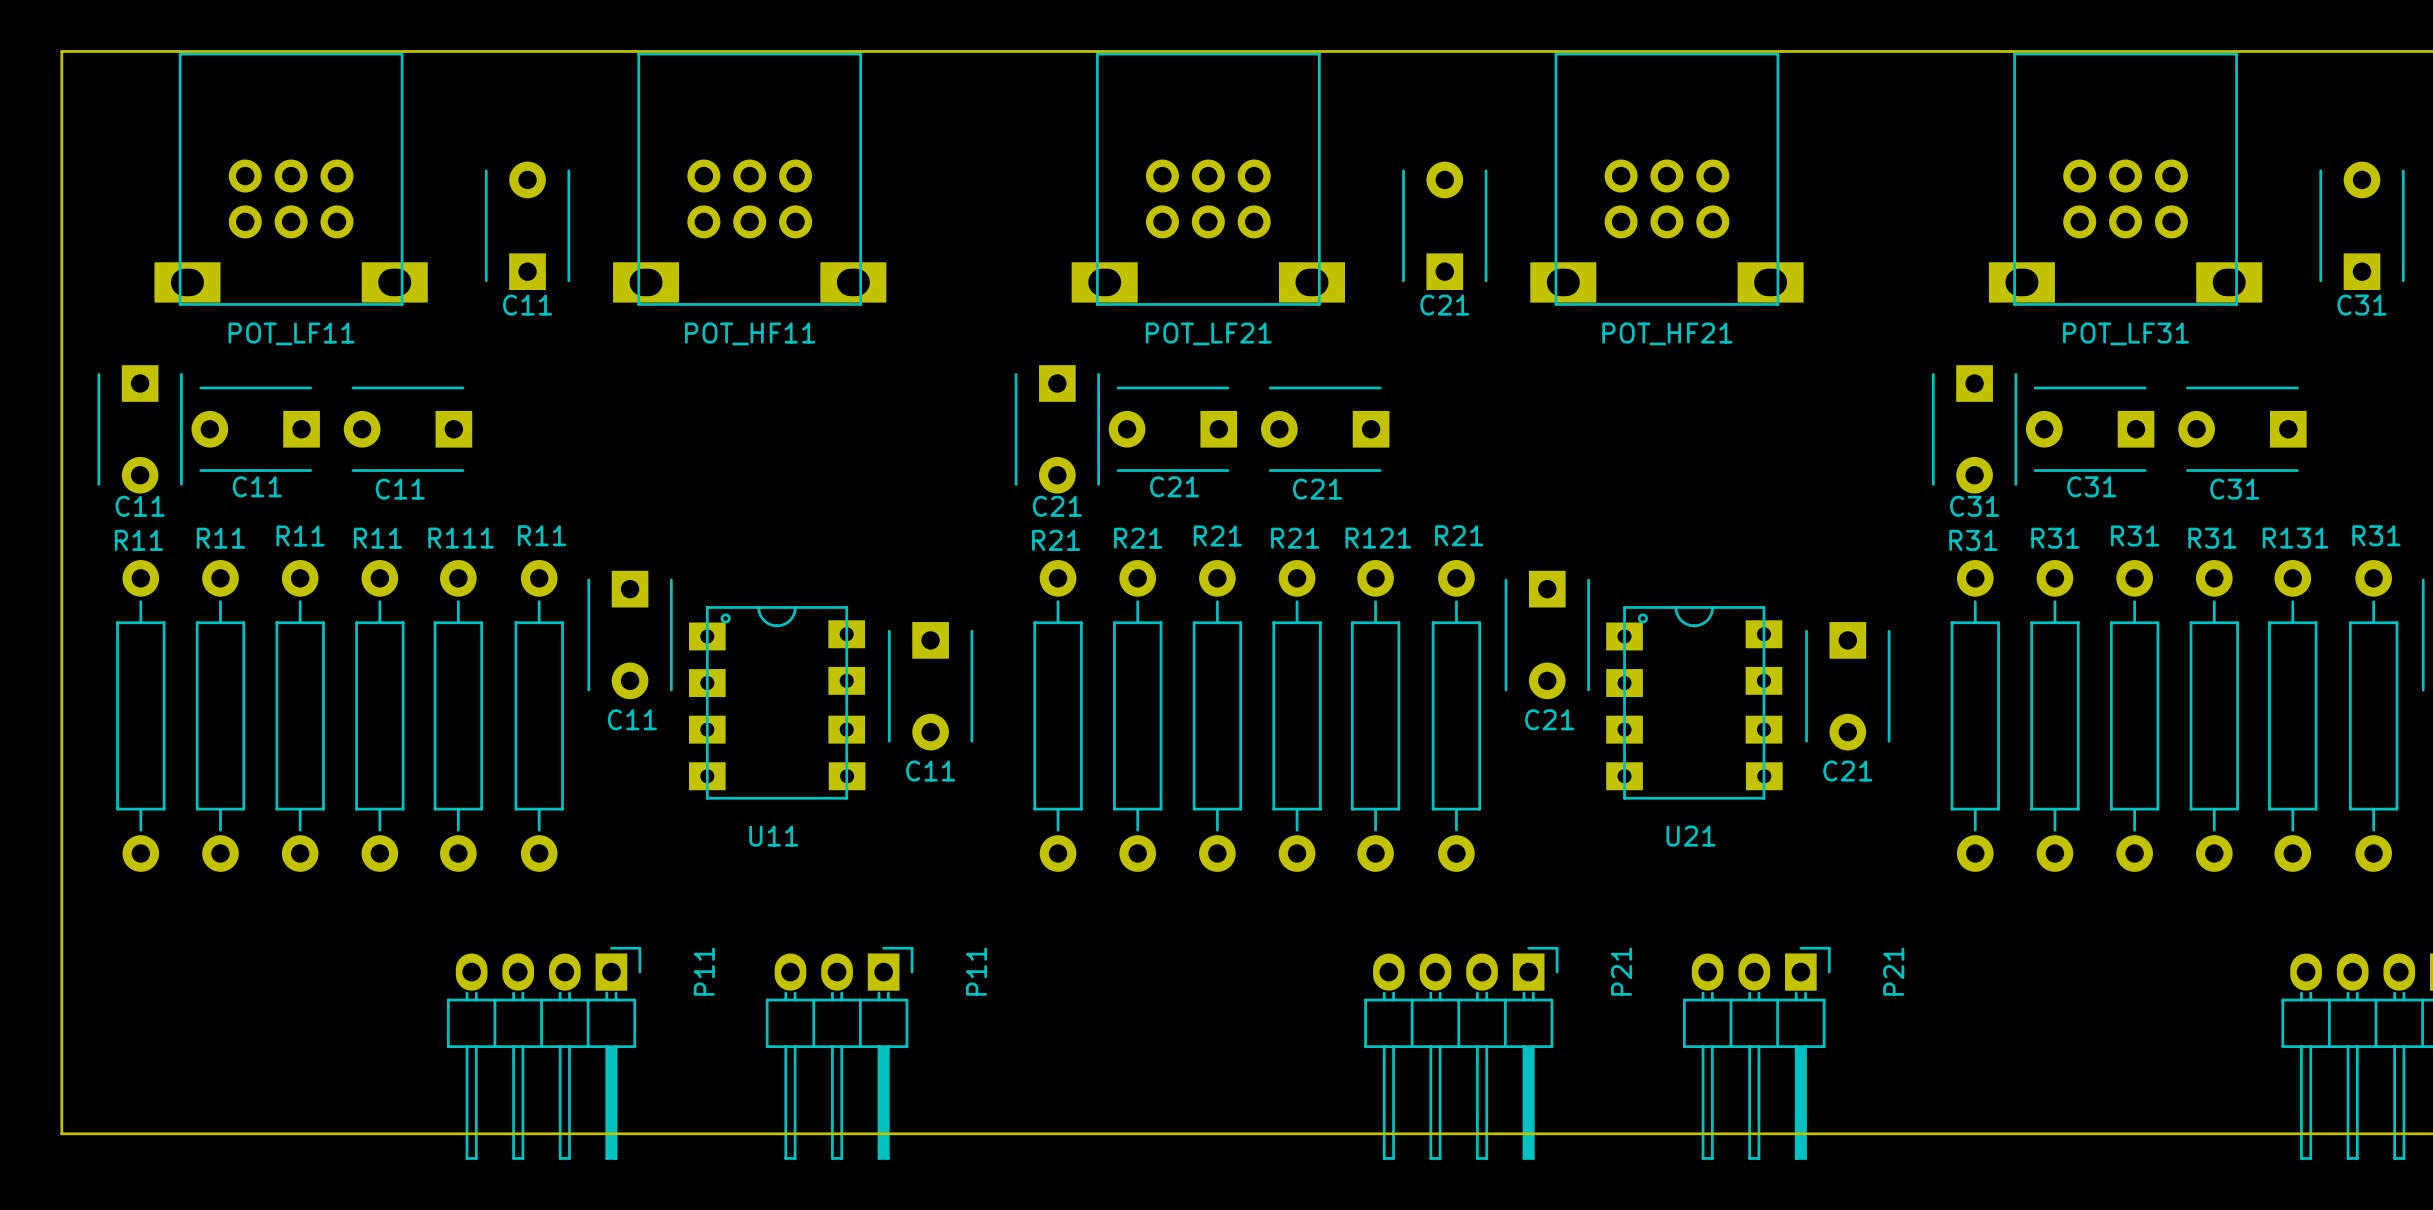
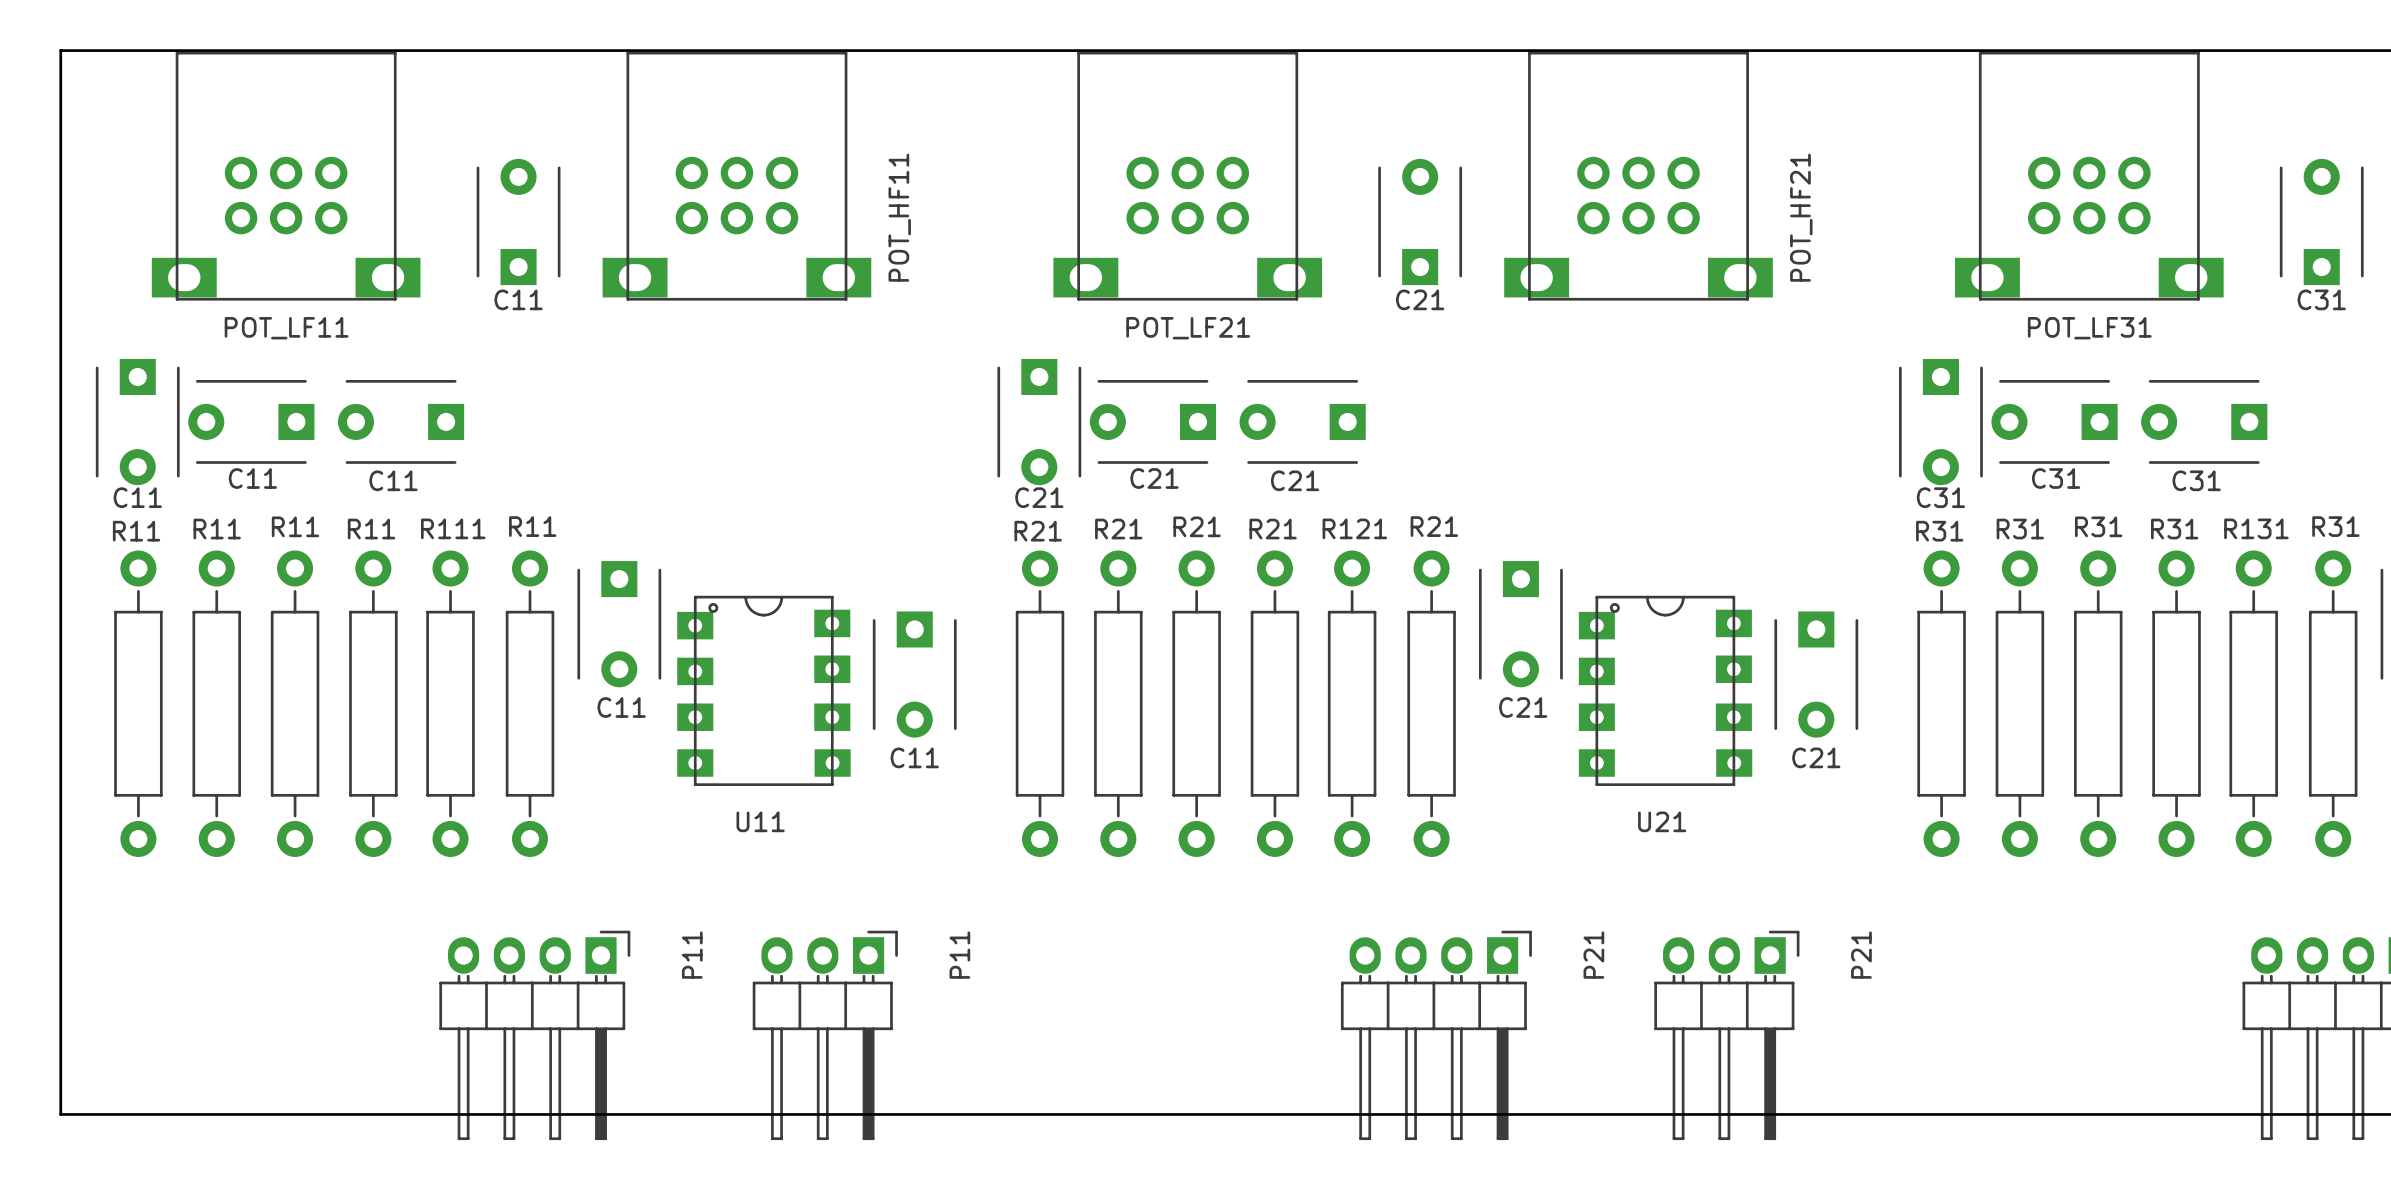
POT_HF11 name rotation: 0° (750, 333) -> 90° counterclockwise (899, 217)
POT_HF11 name position: POT_HF11 (750, 333) -> POT_HF11 (899, 217)
POT_HF21 name rotation: 0° (1667, 333) -> 90° counterclockwise (1801, 217)
POT_HF21 name position: POT_HF21 (1667, 333) -> POT_HF21 (1801, 217)

